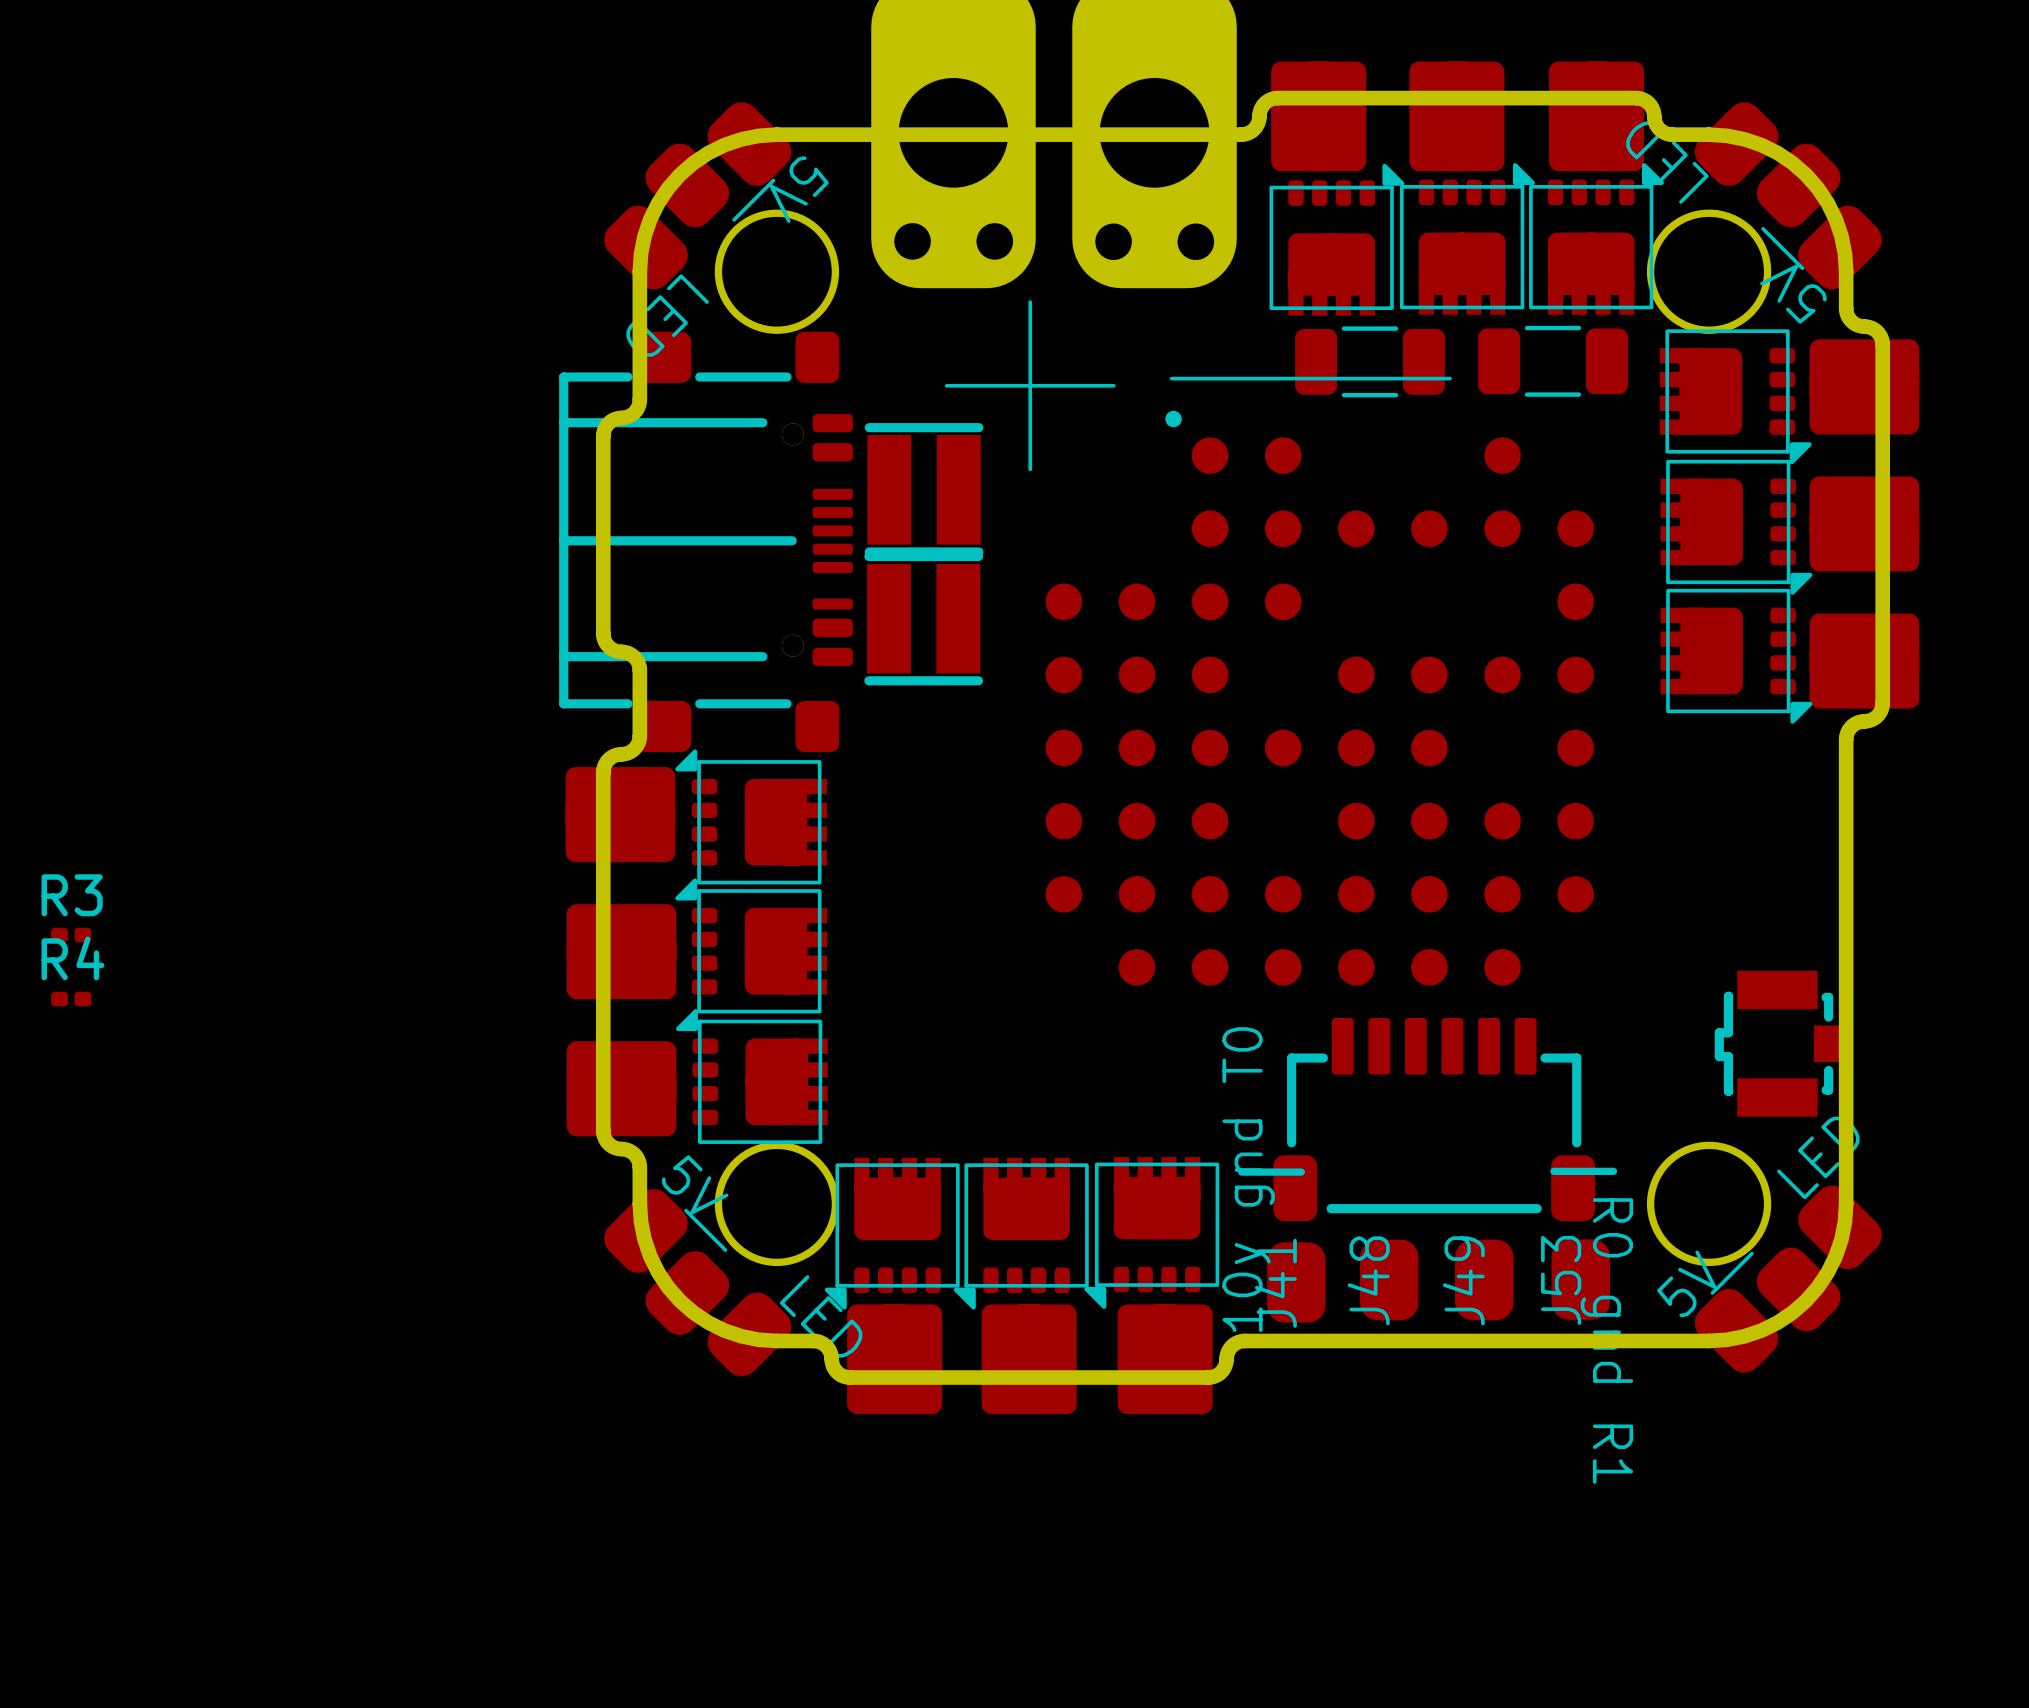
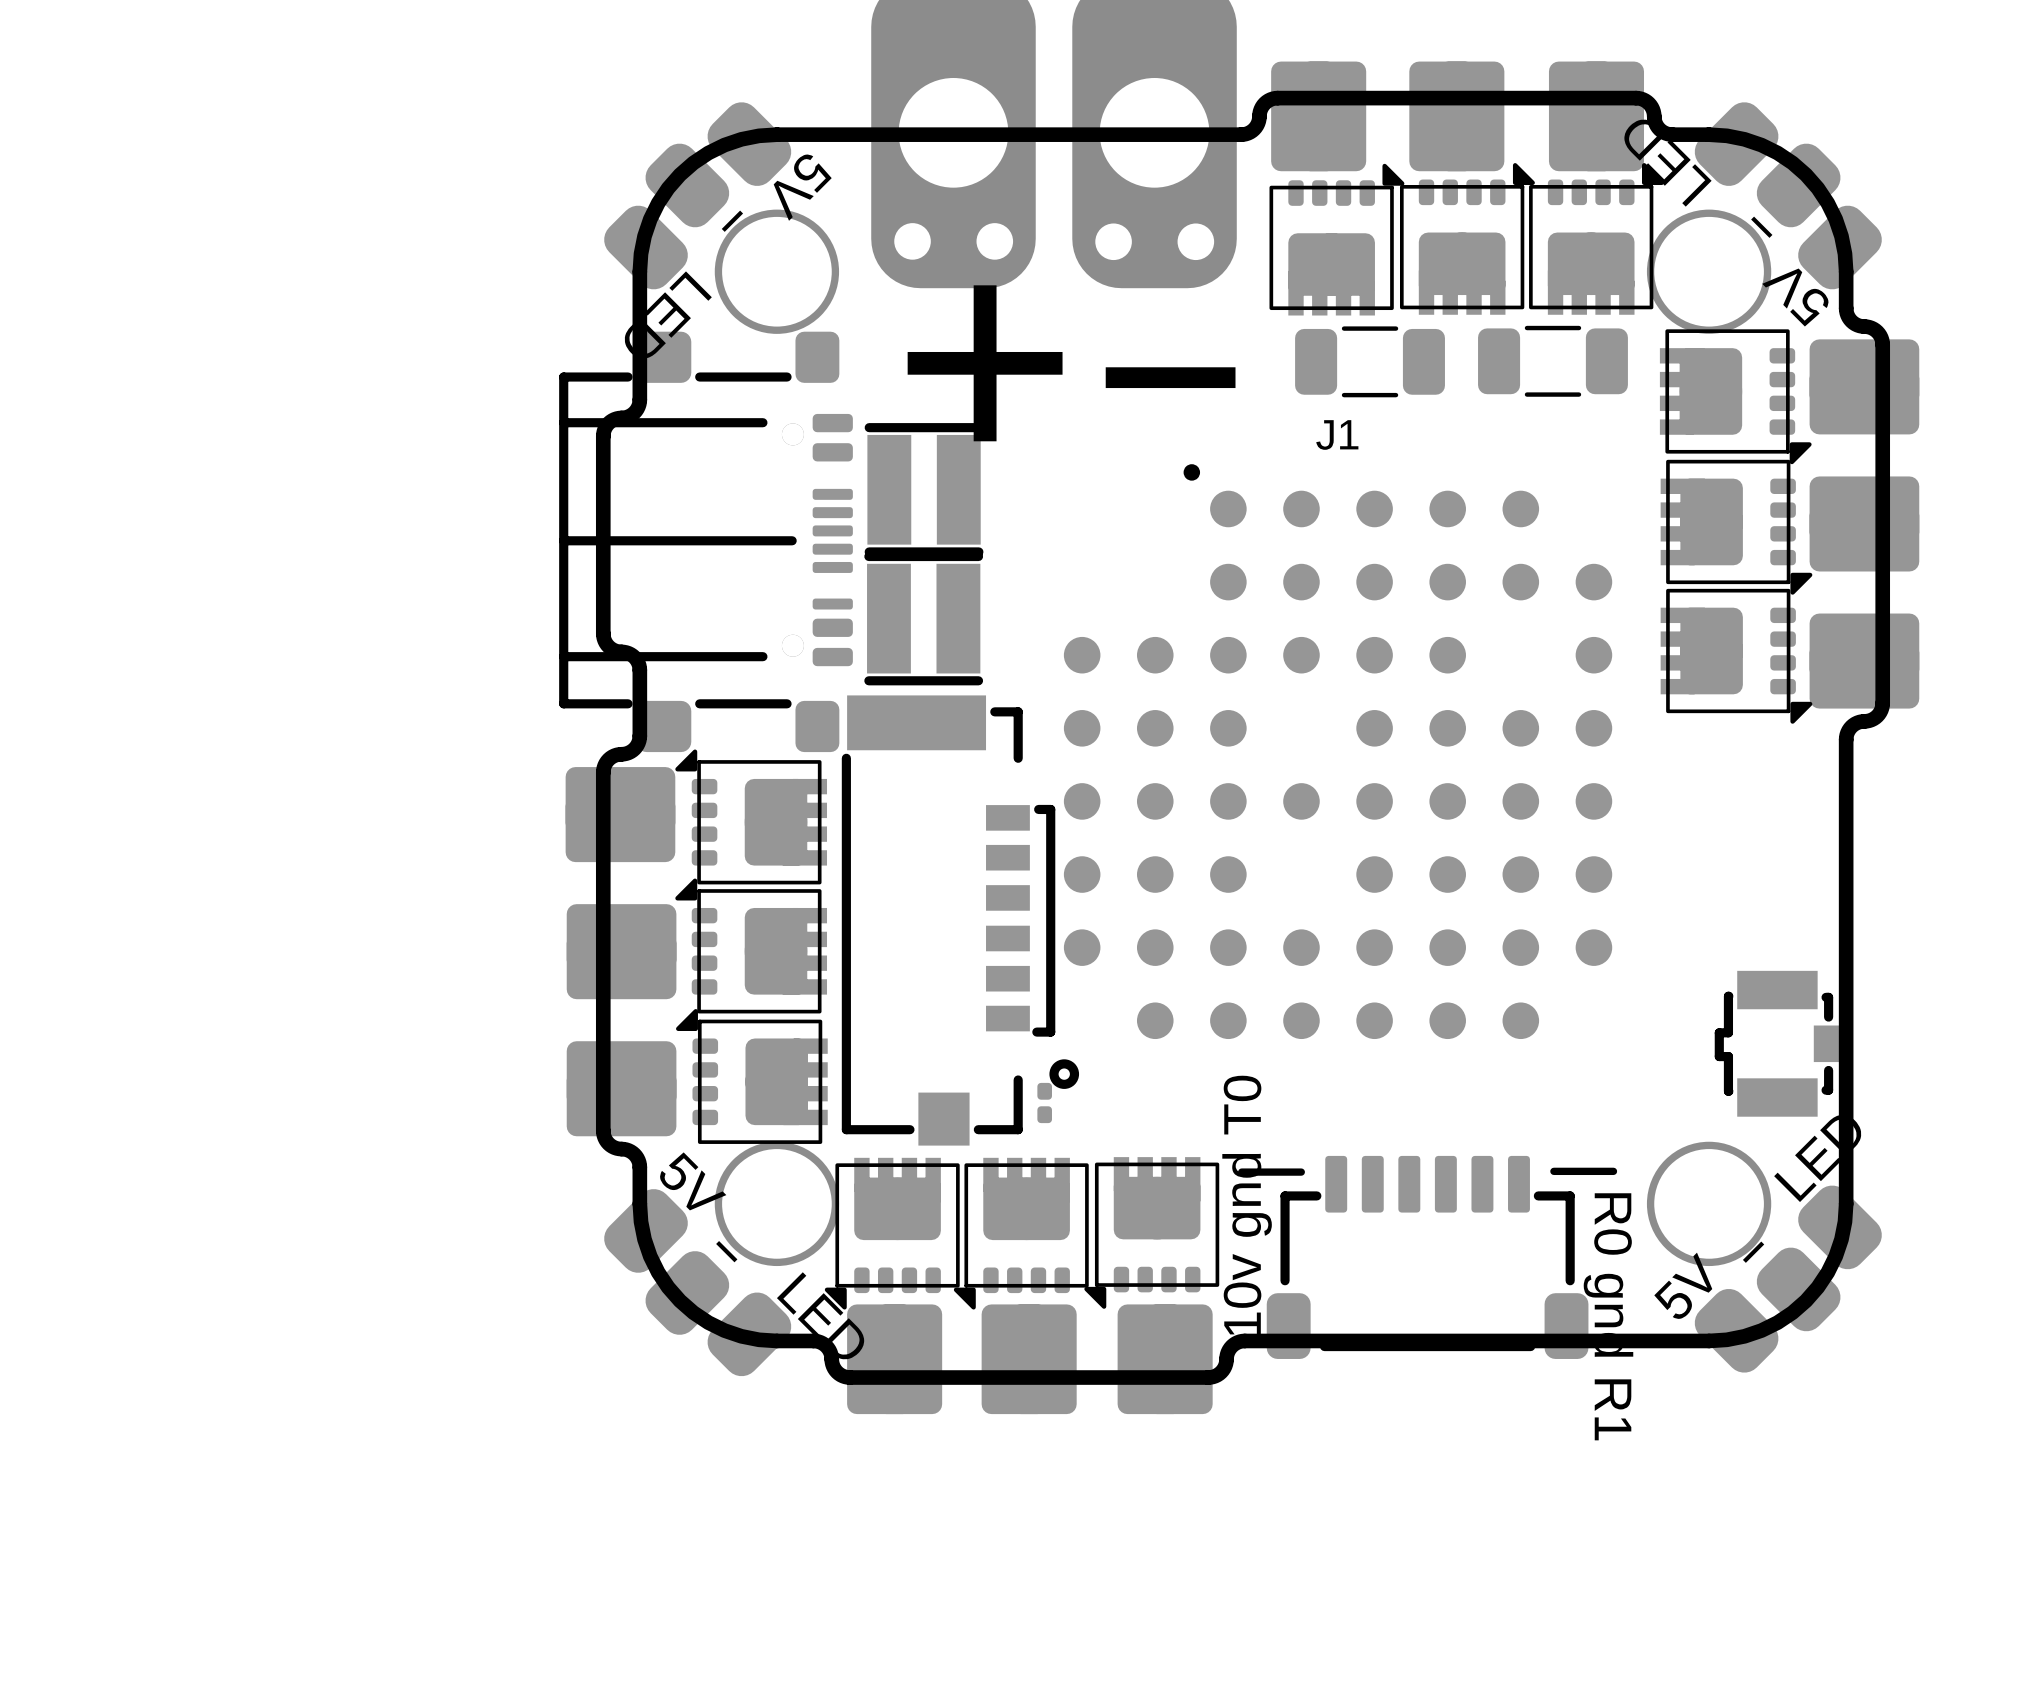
part: (1319, 698) -> none
J1: none -> (1338, 751)
part: none -> (960, 920)
R3: (71, 935) -> none
R4: (71, 999) -> none
part: none -> (1044, 1103)
part position: (1434, 1119) -> (1427, 1257)
J48: (1389, 1279) -> none
J49: (1484, 1279) -> none
J53: (1580, 1279) -> none
J41: (1296, 1282) -> none

